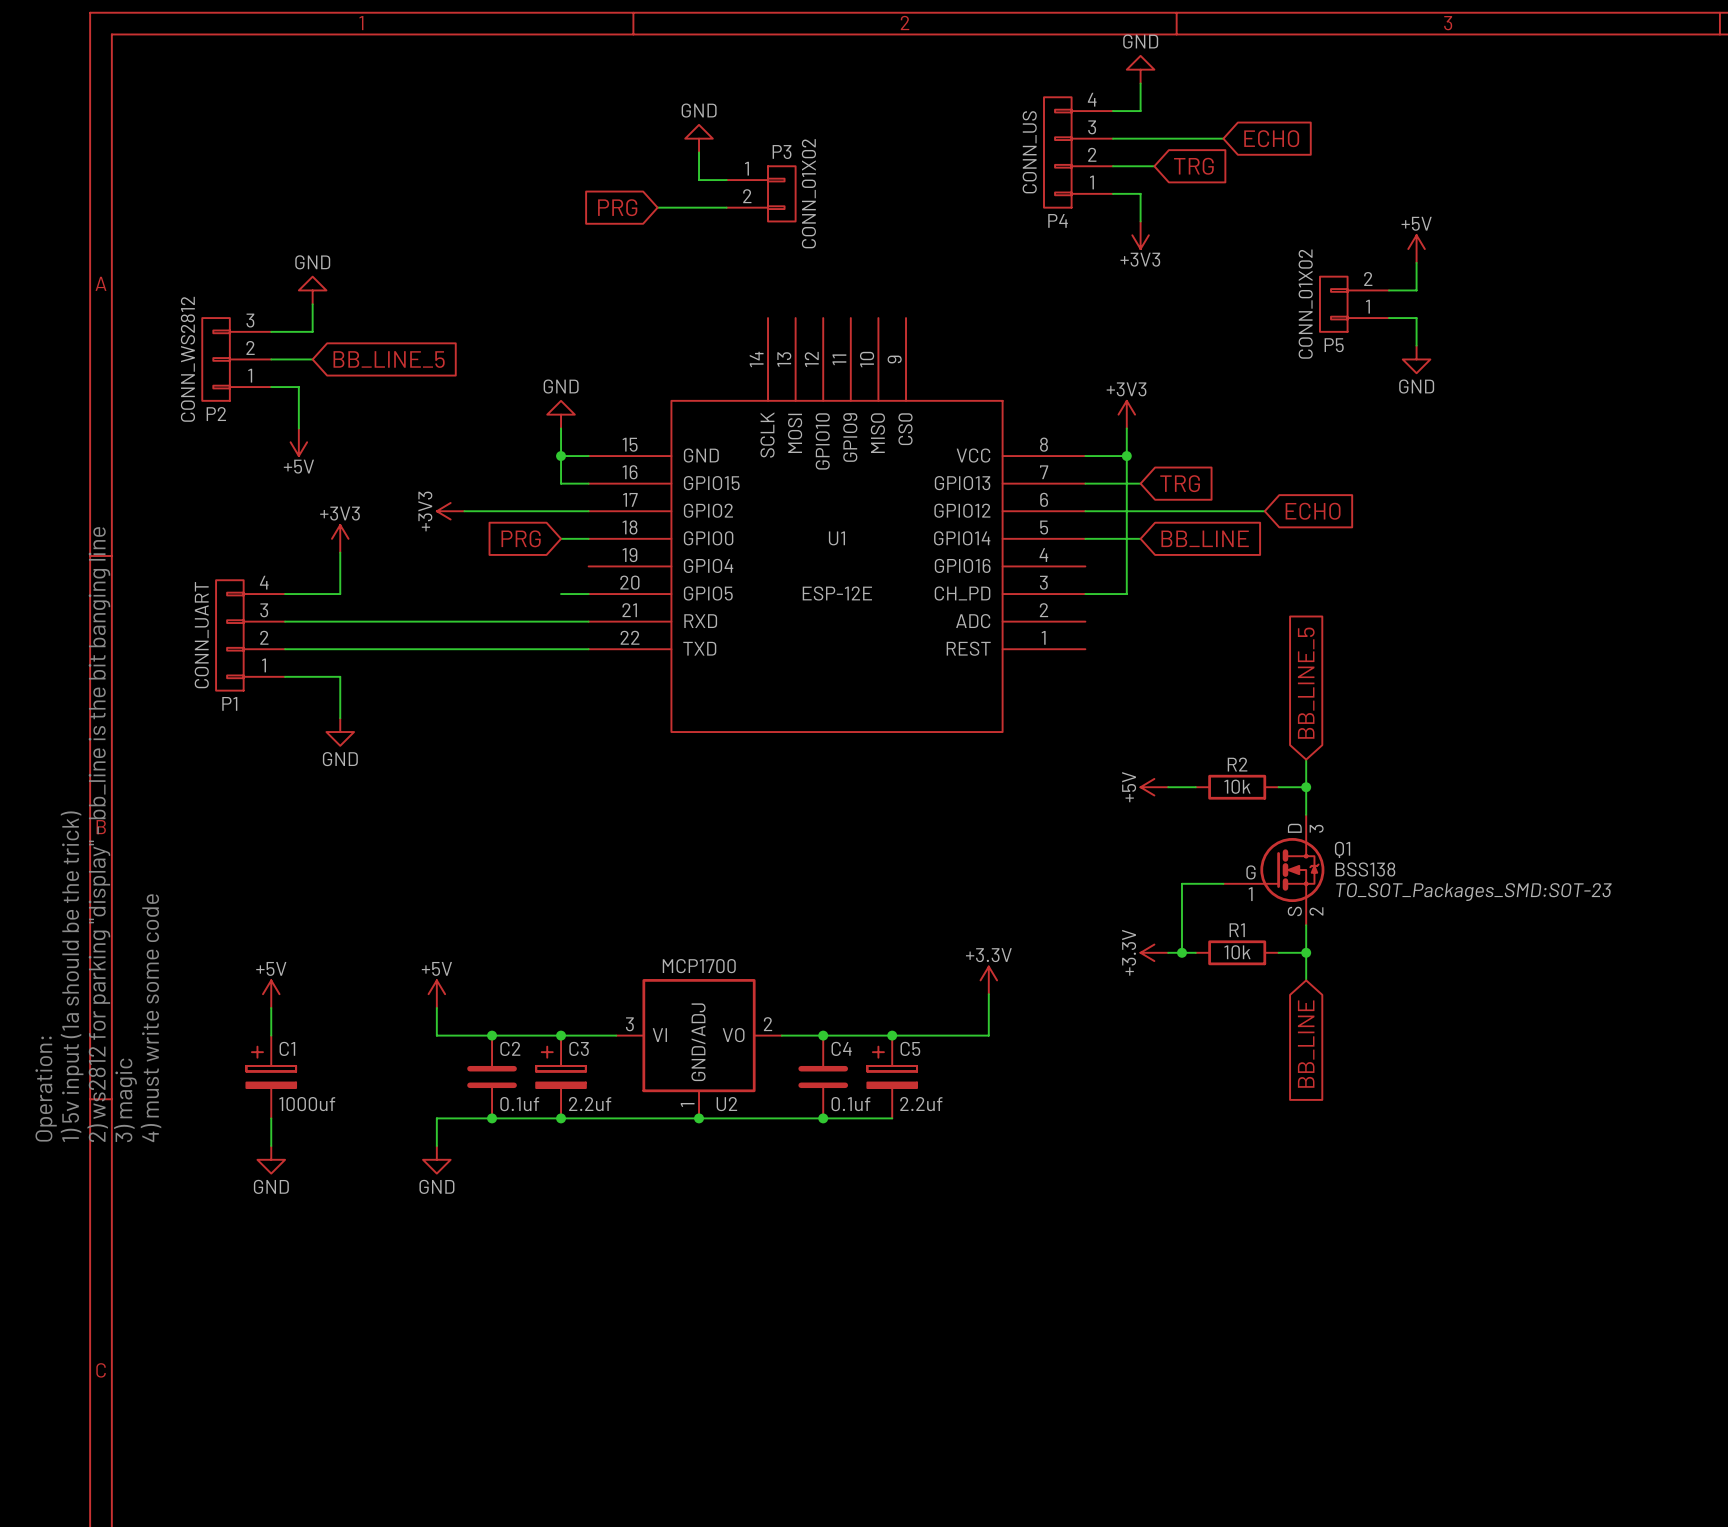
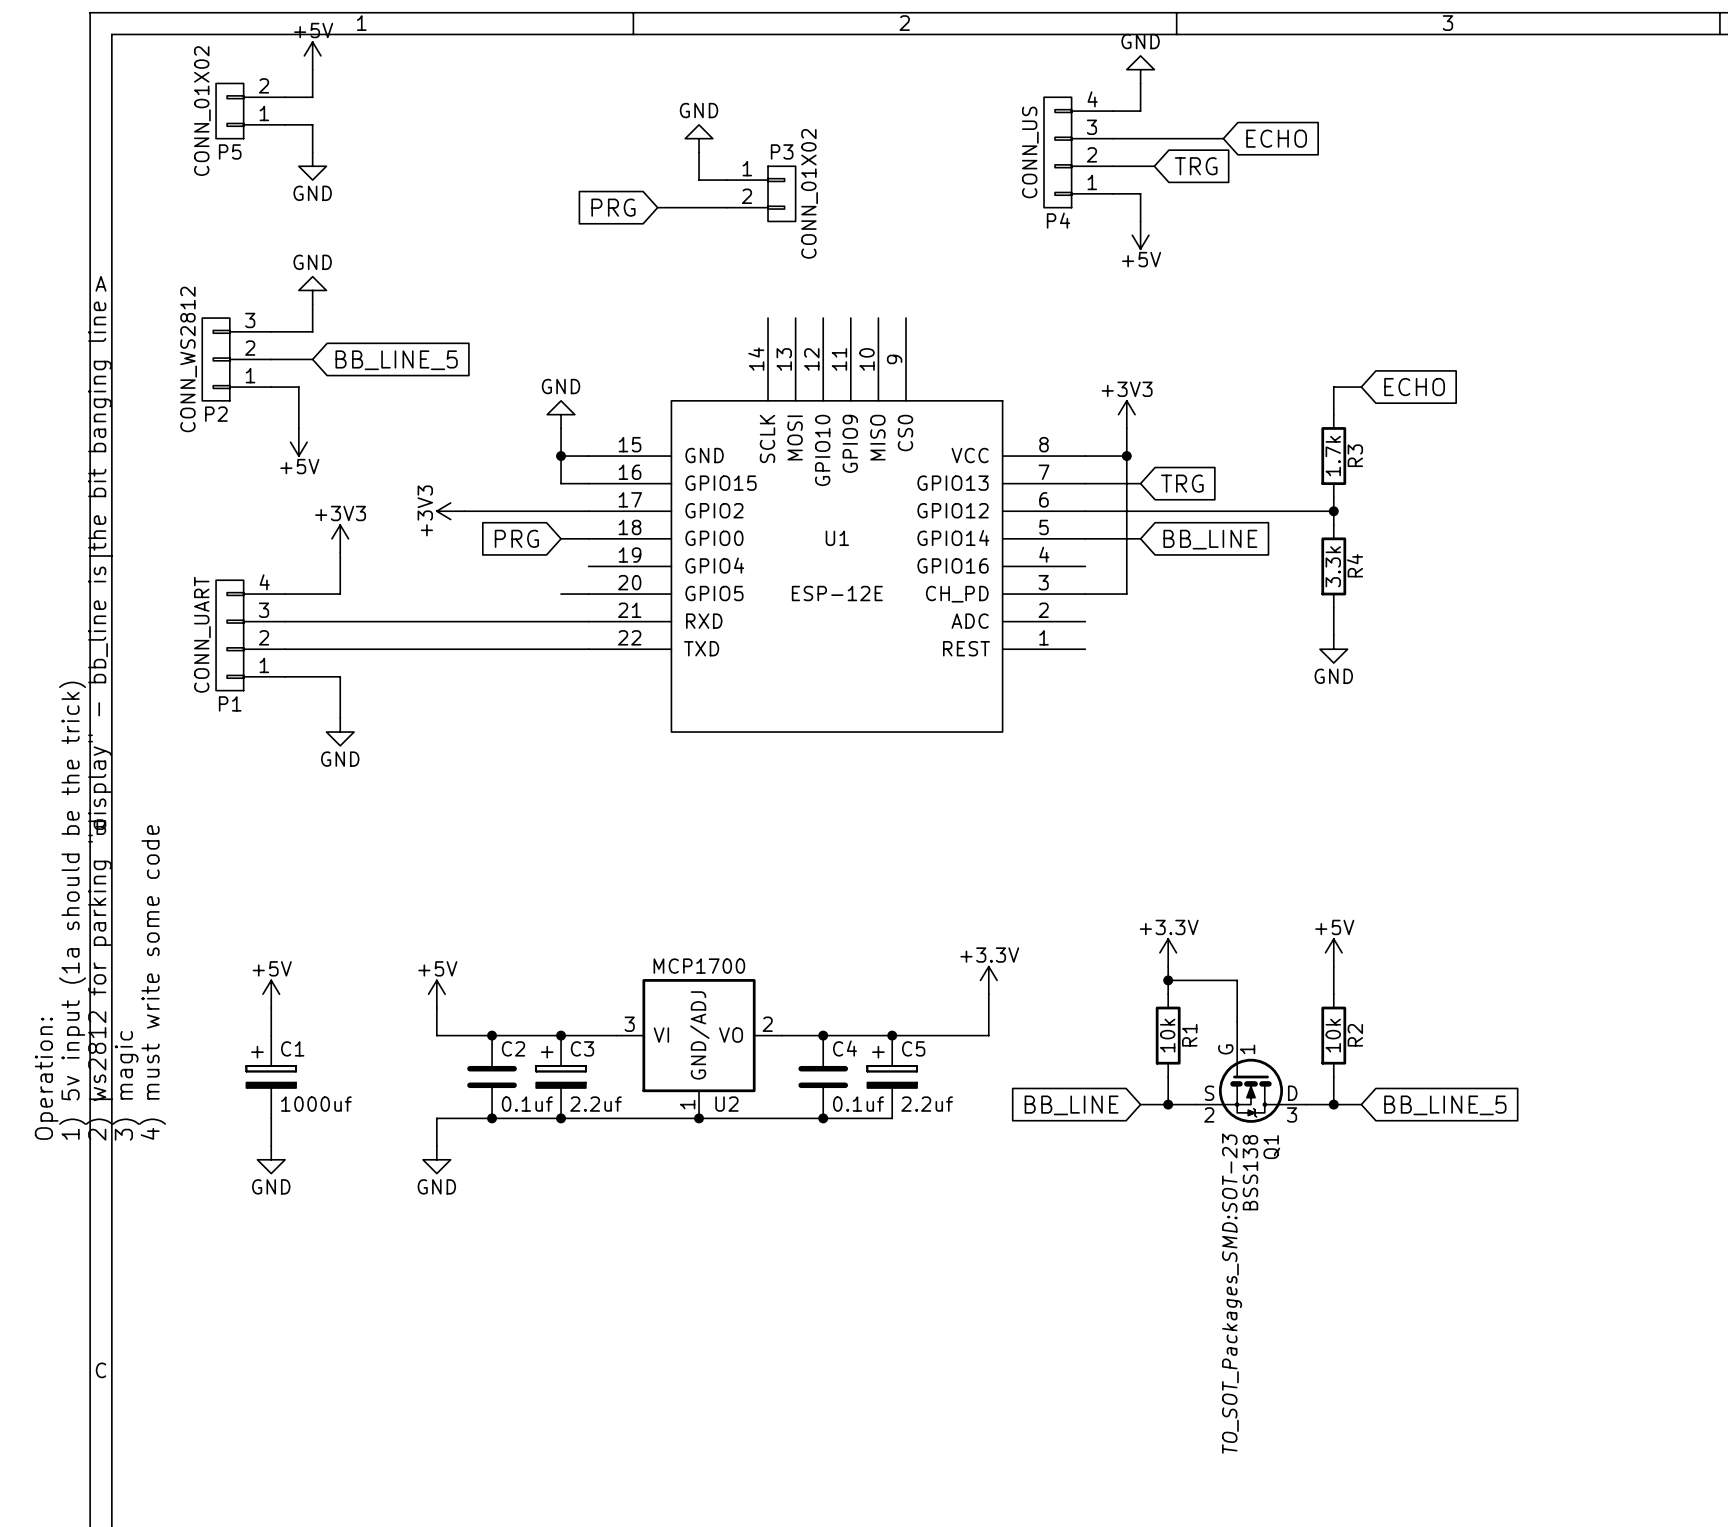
power symbol: none -> +5V (312, 55)
wire: none -> (312, 69) (312, 97) (285, 97)
wire: none -> (285, 124) (312, 124) (312, 152)
power symbol: none -> GND (312, 166)
power symbol: +3V3 (1140, 235) -> +5V (1140, 235)
power symbol: +5V (1416, 249) -> none
wire: (1416, 262) (1416, 290) (1388, 290) -> none
P5 position: (1354, 304) -> (250, 111)
wire: (1388, 318) (1416, 318) (1416, 345) -> none
power symbol: GND (1416, 359) -> none
wire: none -> (1361, 387) (1333, 387) (1333, 414)
R3: none -> 1.7k (1333, 456)
wire: none -> (1333, 497) (1333, 525)
wire: none -> (1264, 511) (1333, 511)
global label position: ECHO (1313, 511) -> ECHO (1414, 387)
junction: none -> (1333, 511)
R4: none -> 3.3k (1333, 566)
wire: none -> (1333, 607) (1333, 635)
power symbol: none -> GND (1333, 649)
global label: BB_LINE_5 (1306, 683) -> none
wire: (1306, 759) (1306, 814) -> none
power symbol rotation: 0° (1154, 787) -> 90° clockwise (1333, 952)
power symbol position: +5V (1154, 787) -> +5V (1333, 952)
wire: (1168, 787) (1195, 787) -> none
R2 rotation: 0° (1237, 787) -> 90° clockwise (1333, 1035)
R2 position: (1237, 787) -> (1333, 1035)
wire: (1278, 787) (1306, 787) -> none
junction: (1306, 787) -> none
Q1 position: (1273, 870) -> (1250, 1072)
Q1 rotation: 0° (1292, 870) -> 90° clockwise (1250, 1090)
wire: (1223, 883) (1181, 883) (1181, 952) -> none
wire: (1306, 925) (1306, 980) -> none
power symbol rotation: 0° (1154, 952) -> 90° clockwise (1168, 952)
wire: (1168, 952) (1195, 952) -> none
junction position: (1181, 952) -> (1168, 980)
R1 rotation: 0° (1237, 952) -> 90° clockwise (1168, 1035)
R1 position: (1237, 952) -> (1168, 1035)
wire: (1278, 952) (1306, 952) -> none
junction: (1306, 952) -> none
wire: none -> (1168, 966) (1168, 994)
wire: none -> (1333, 966) (1333, 994)
wire: none -> (1168, 980) (1237, 980) (1237, 1021)
global label rotation: 0° (1306, 1044) -> 90° clockwise (1071, 1105)
global label position: BB_LINE (1306, 1044) -> BB_LINE (1071, 1105)
wire: none -> (1168, 1077) (1168, 1104)
wire: none -> (1333, 1077) (1333, 1104)
wire: none -> (1140, 1104) (1195, 1104)
junction: none -> (1168, 1104)
wire: none -> (1306, 1104) (1361, 1104)
junction: none -> (1333, 1104)
global label: none -> BB_LINE_5 (1445, 1105)

